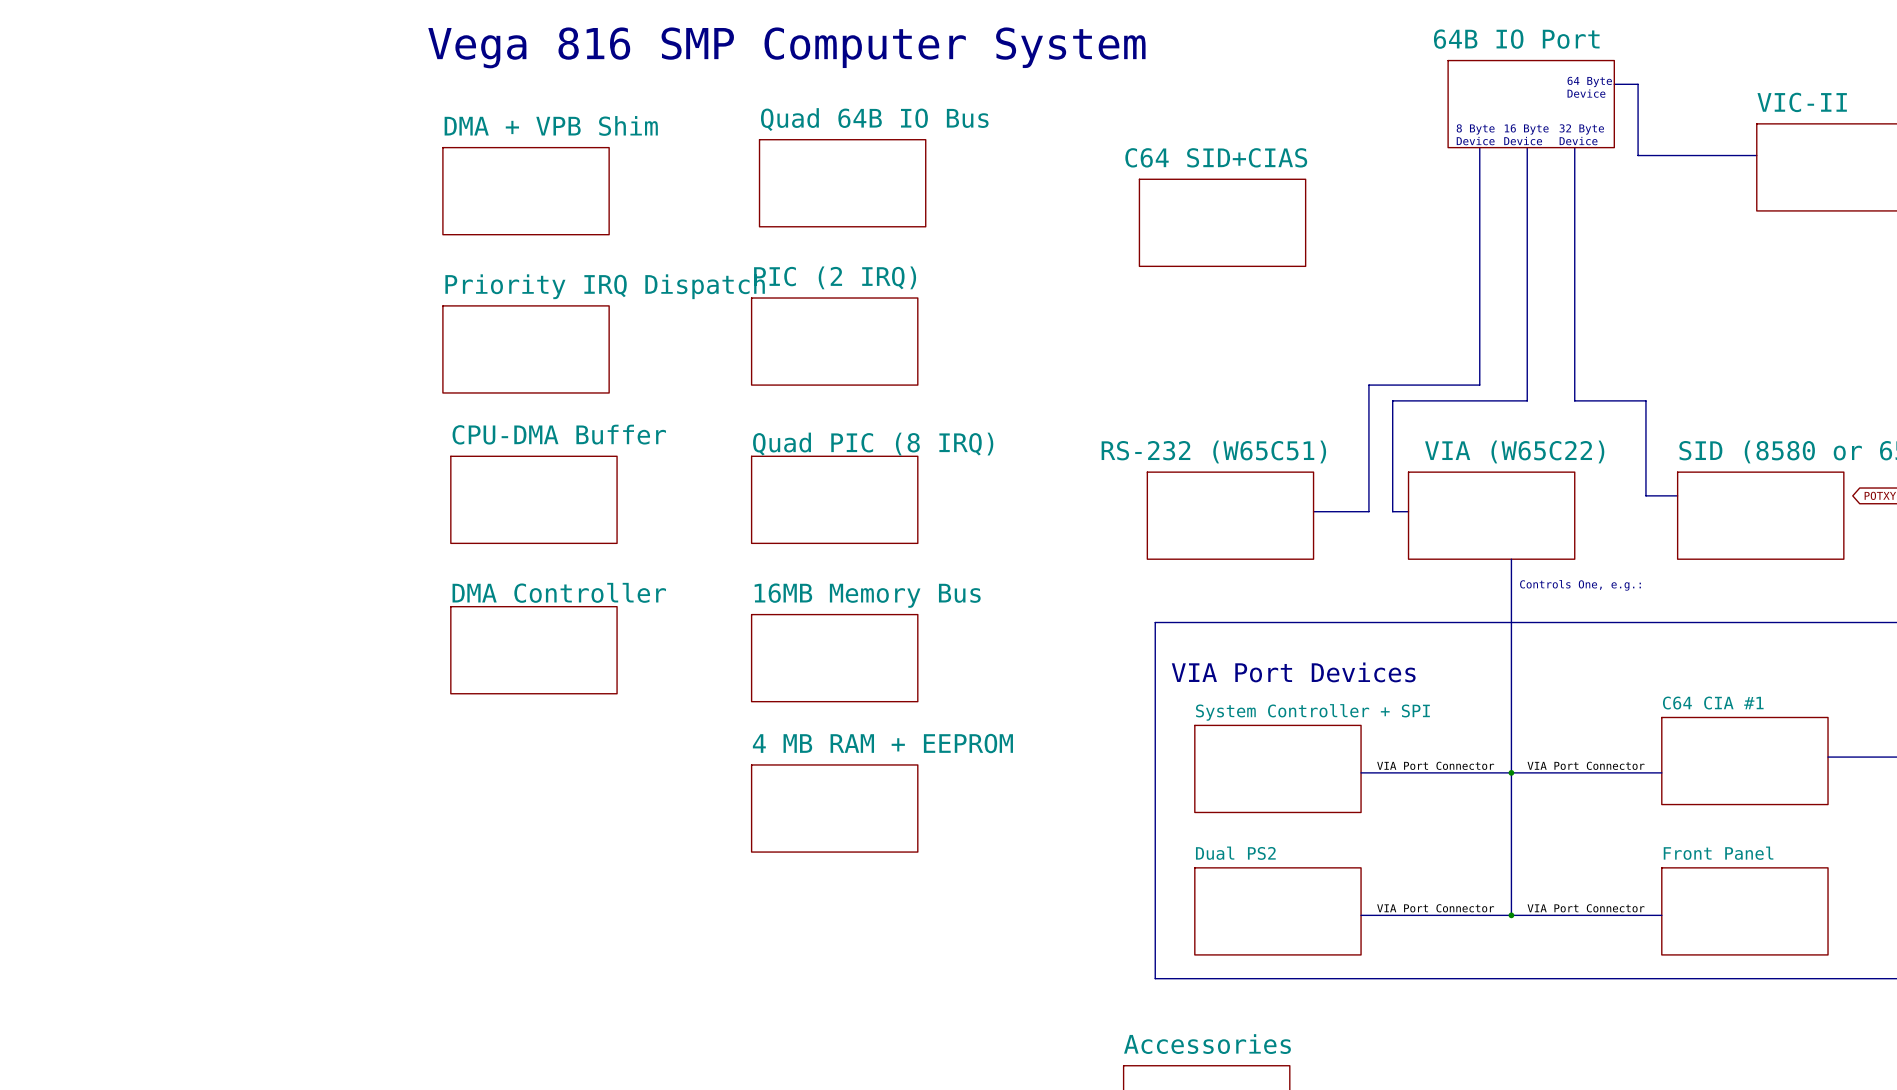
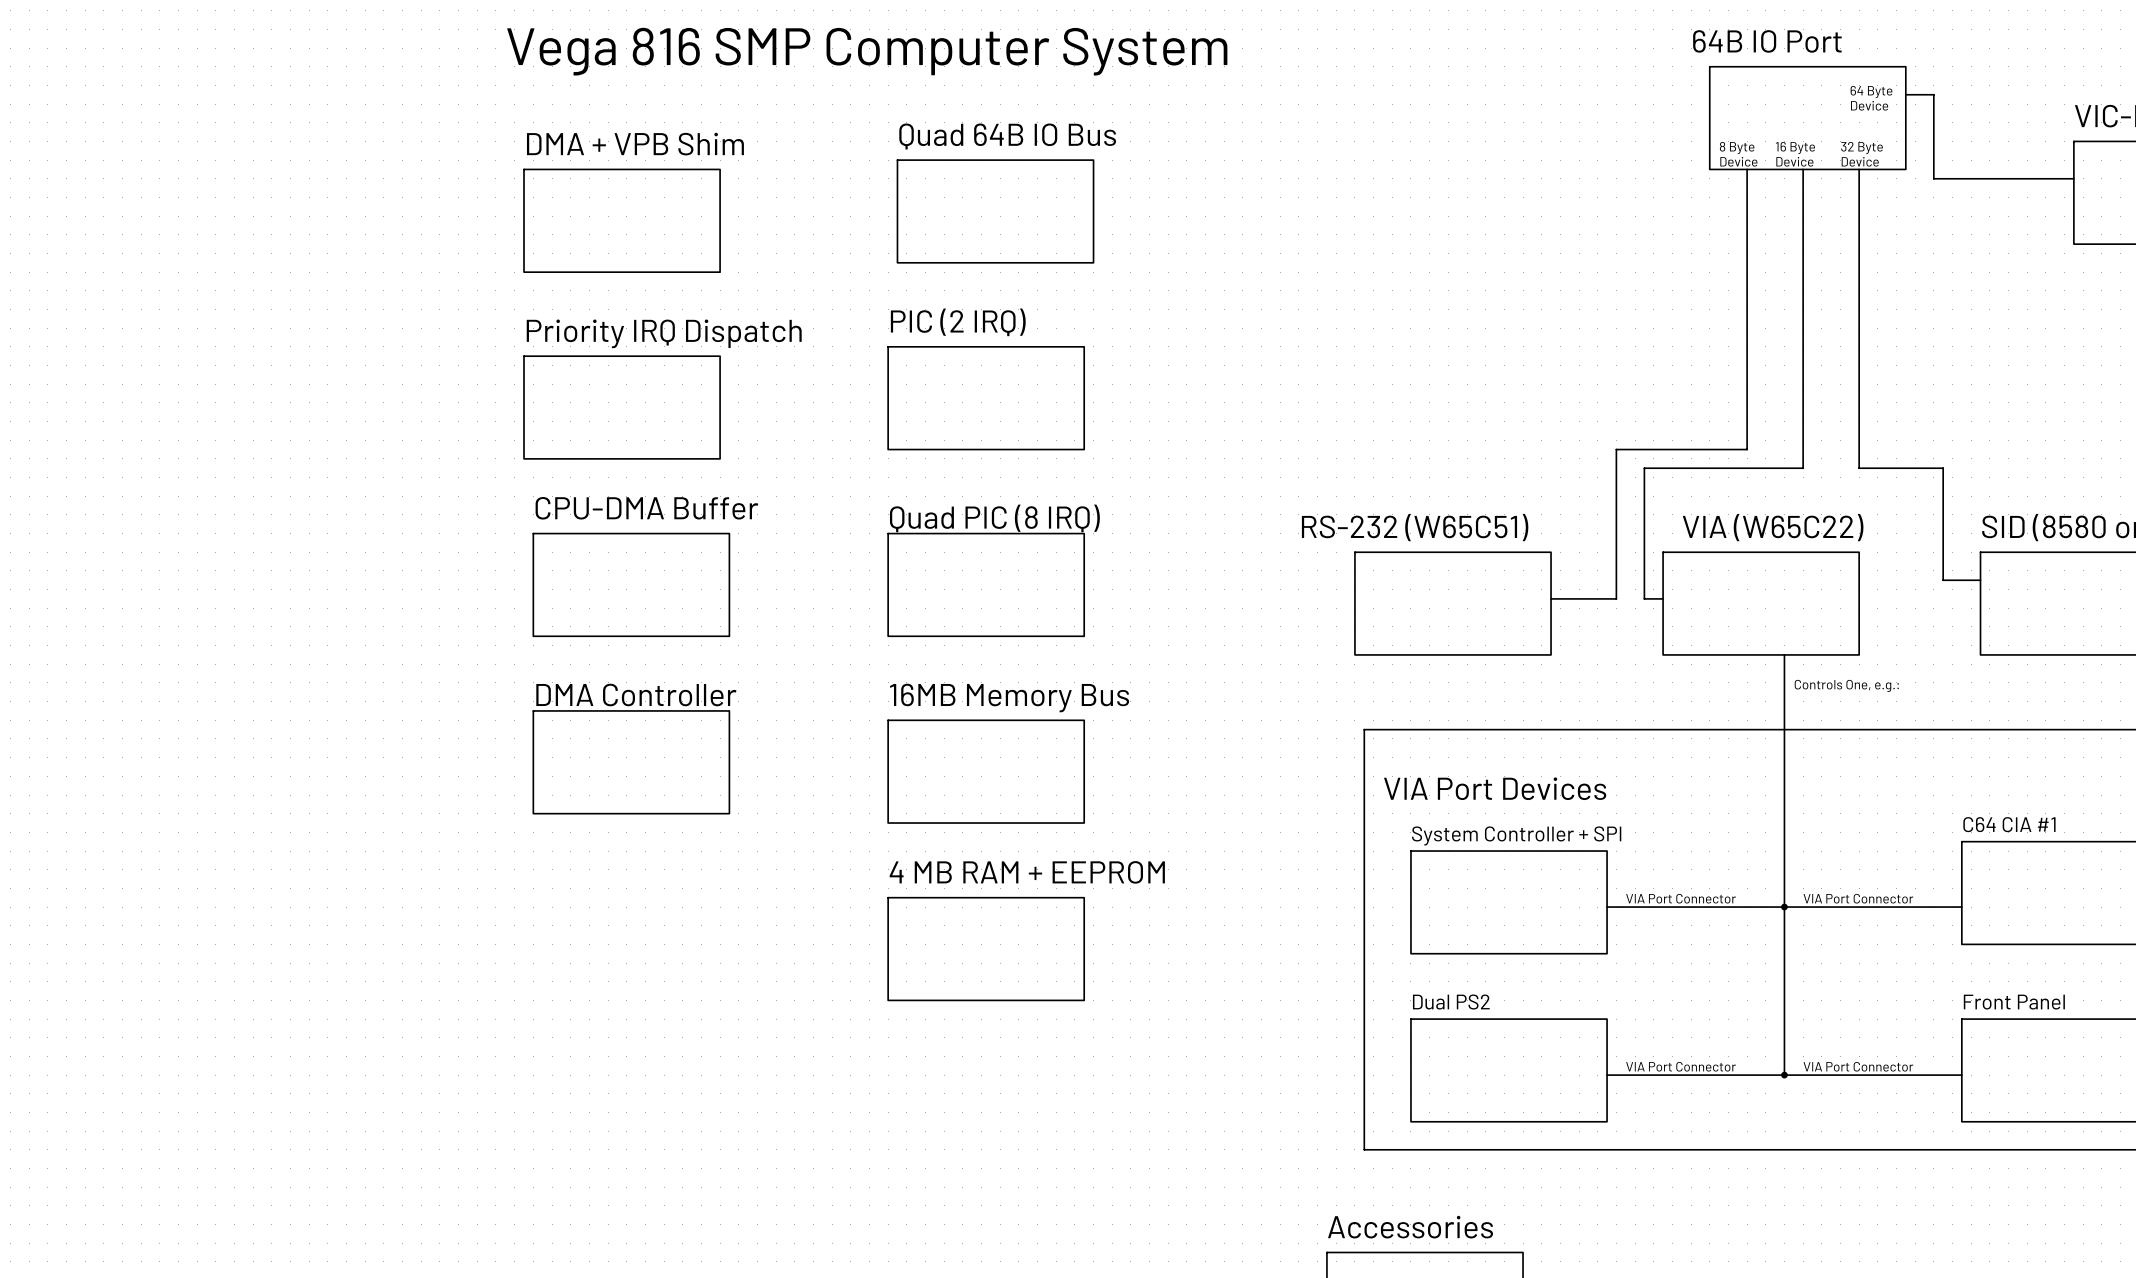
sheet C64 SID+CIAS: (1222, 222) -> none

